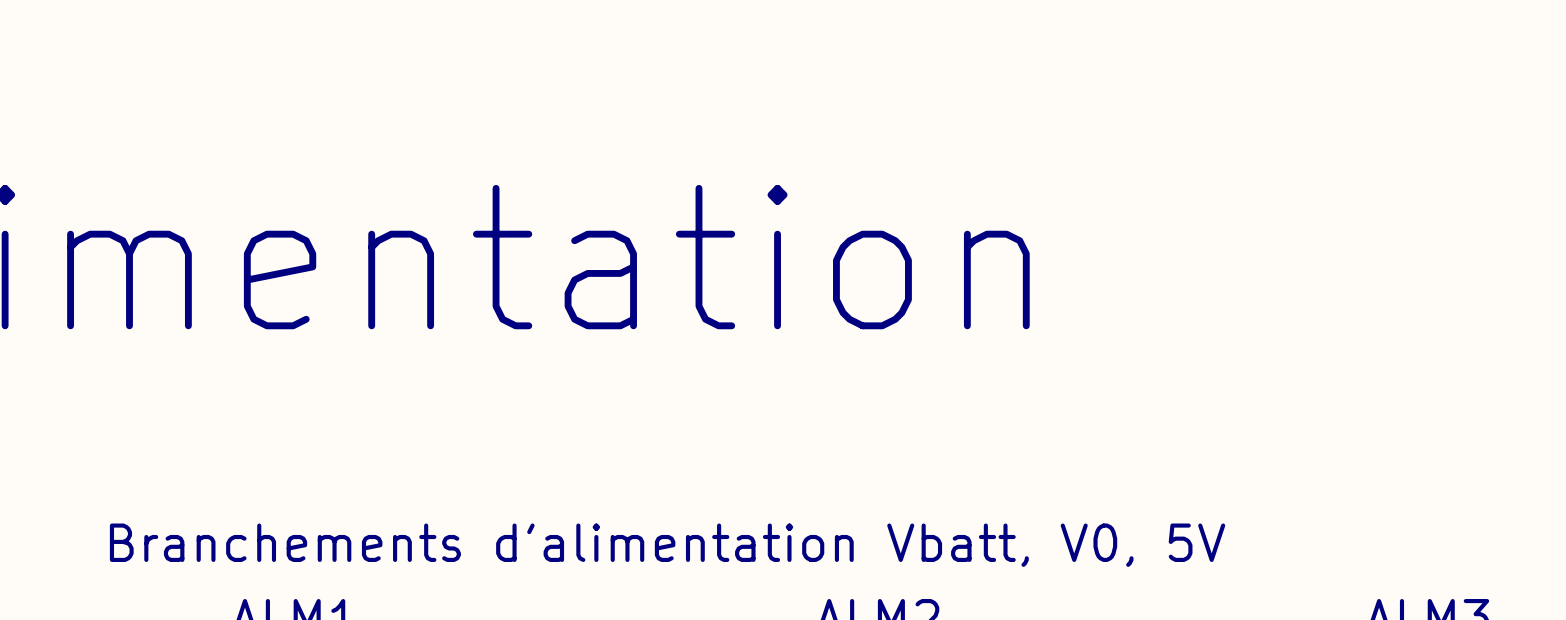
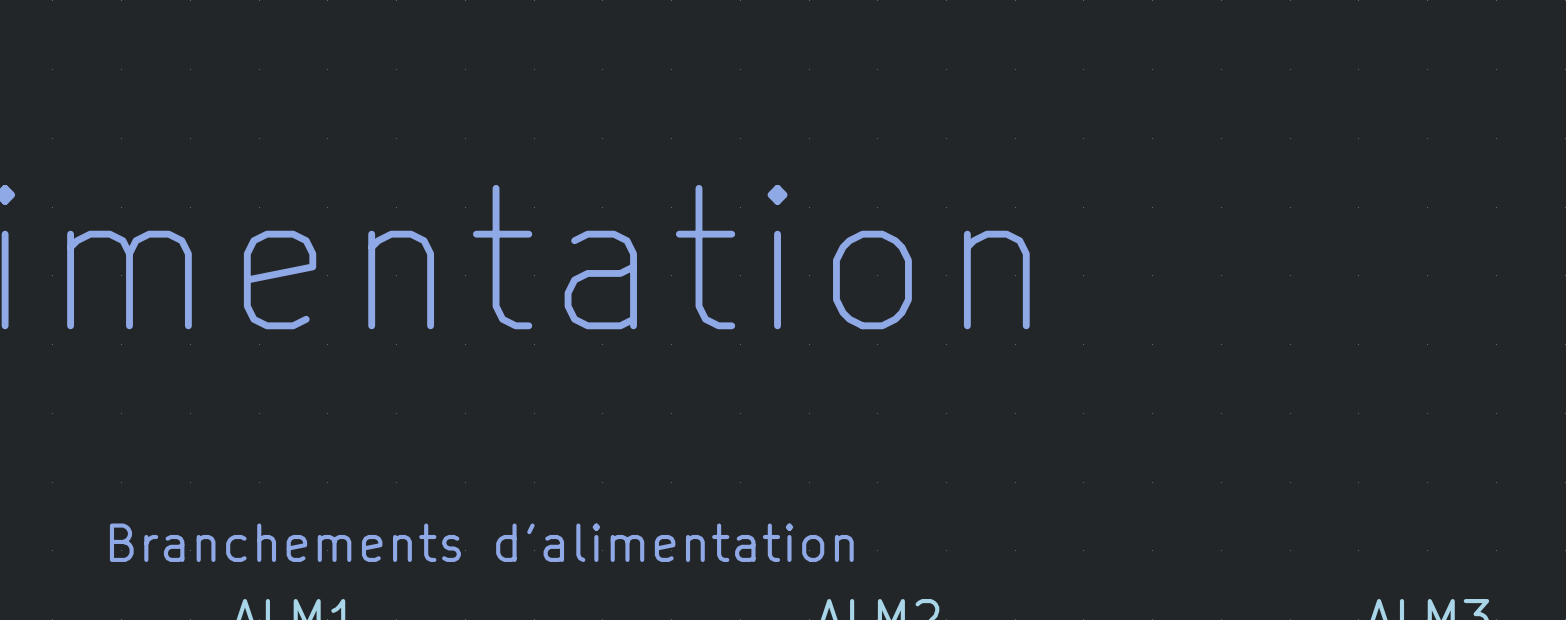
text: Branchements d'alimentation Vbatt, V0, 5V (667, 545) -> Branchements d'alimentation (481, 542)

